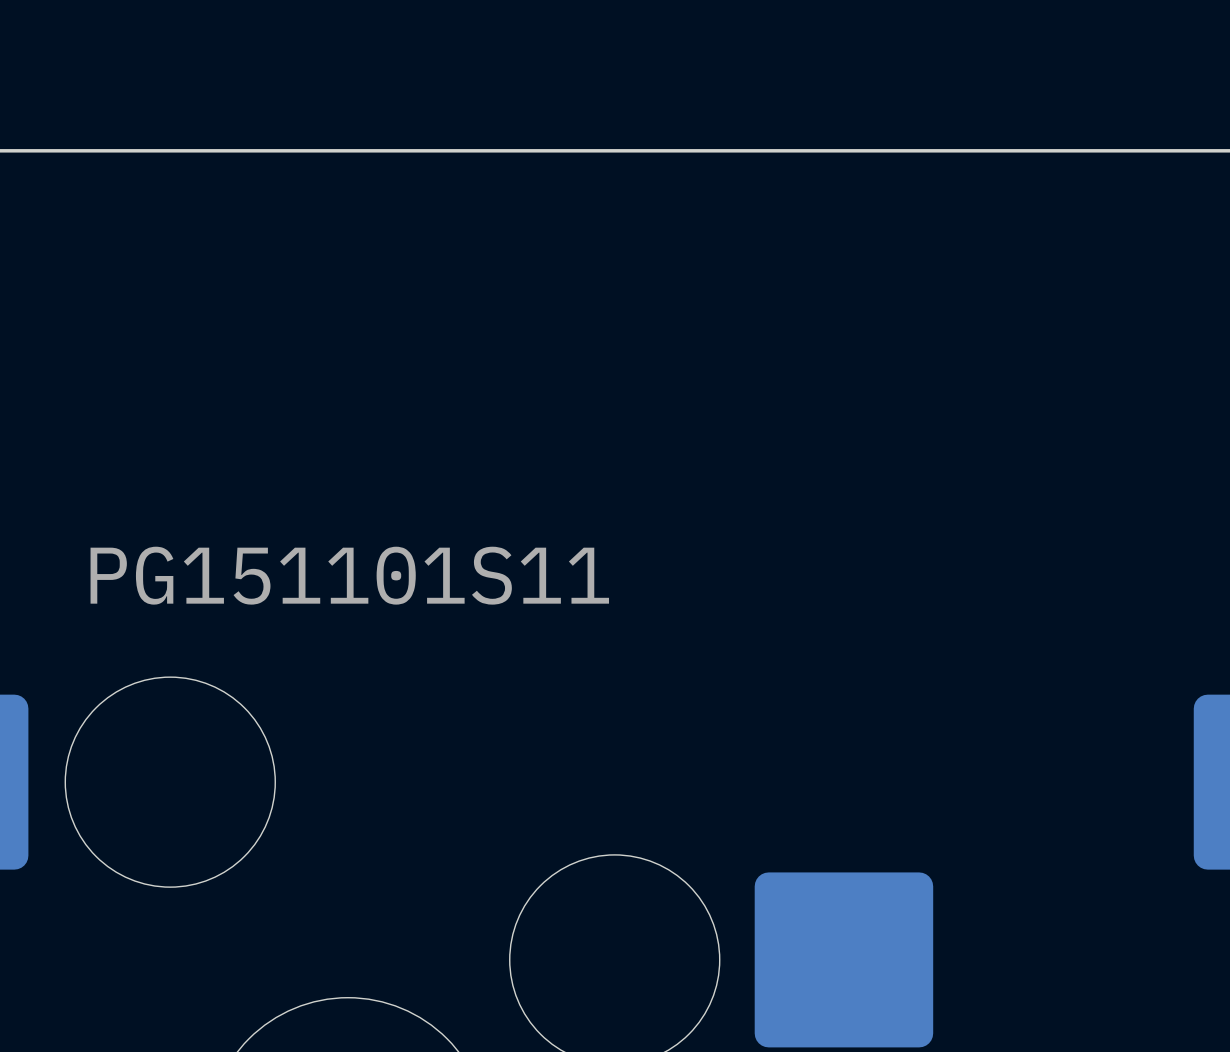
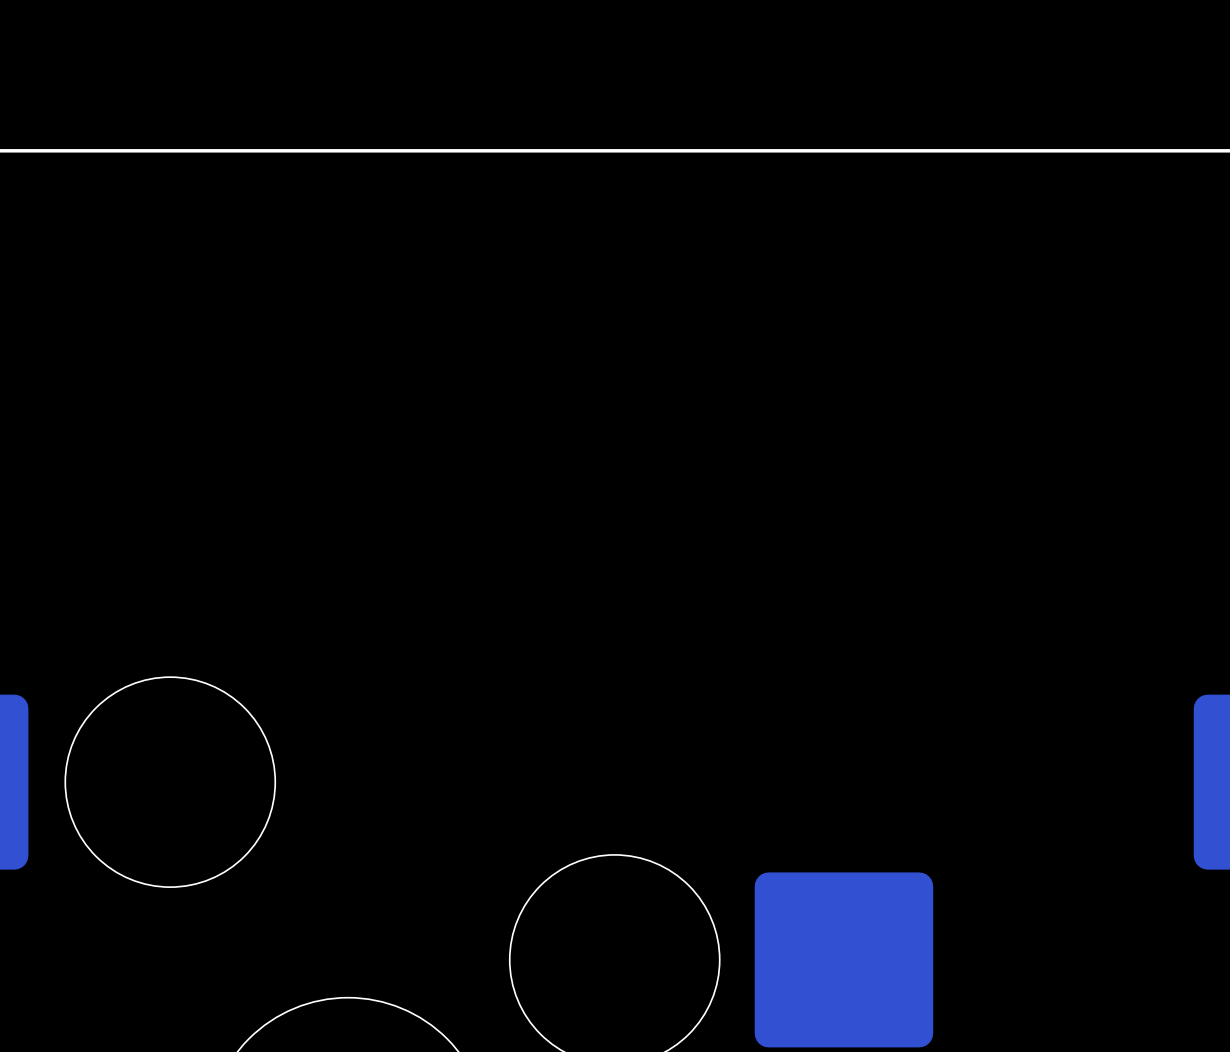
part value: PG151101S11 (349, 575) -> none

